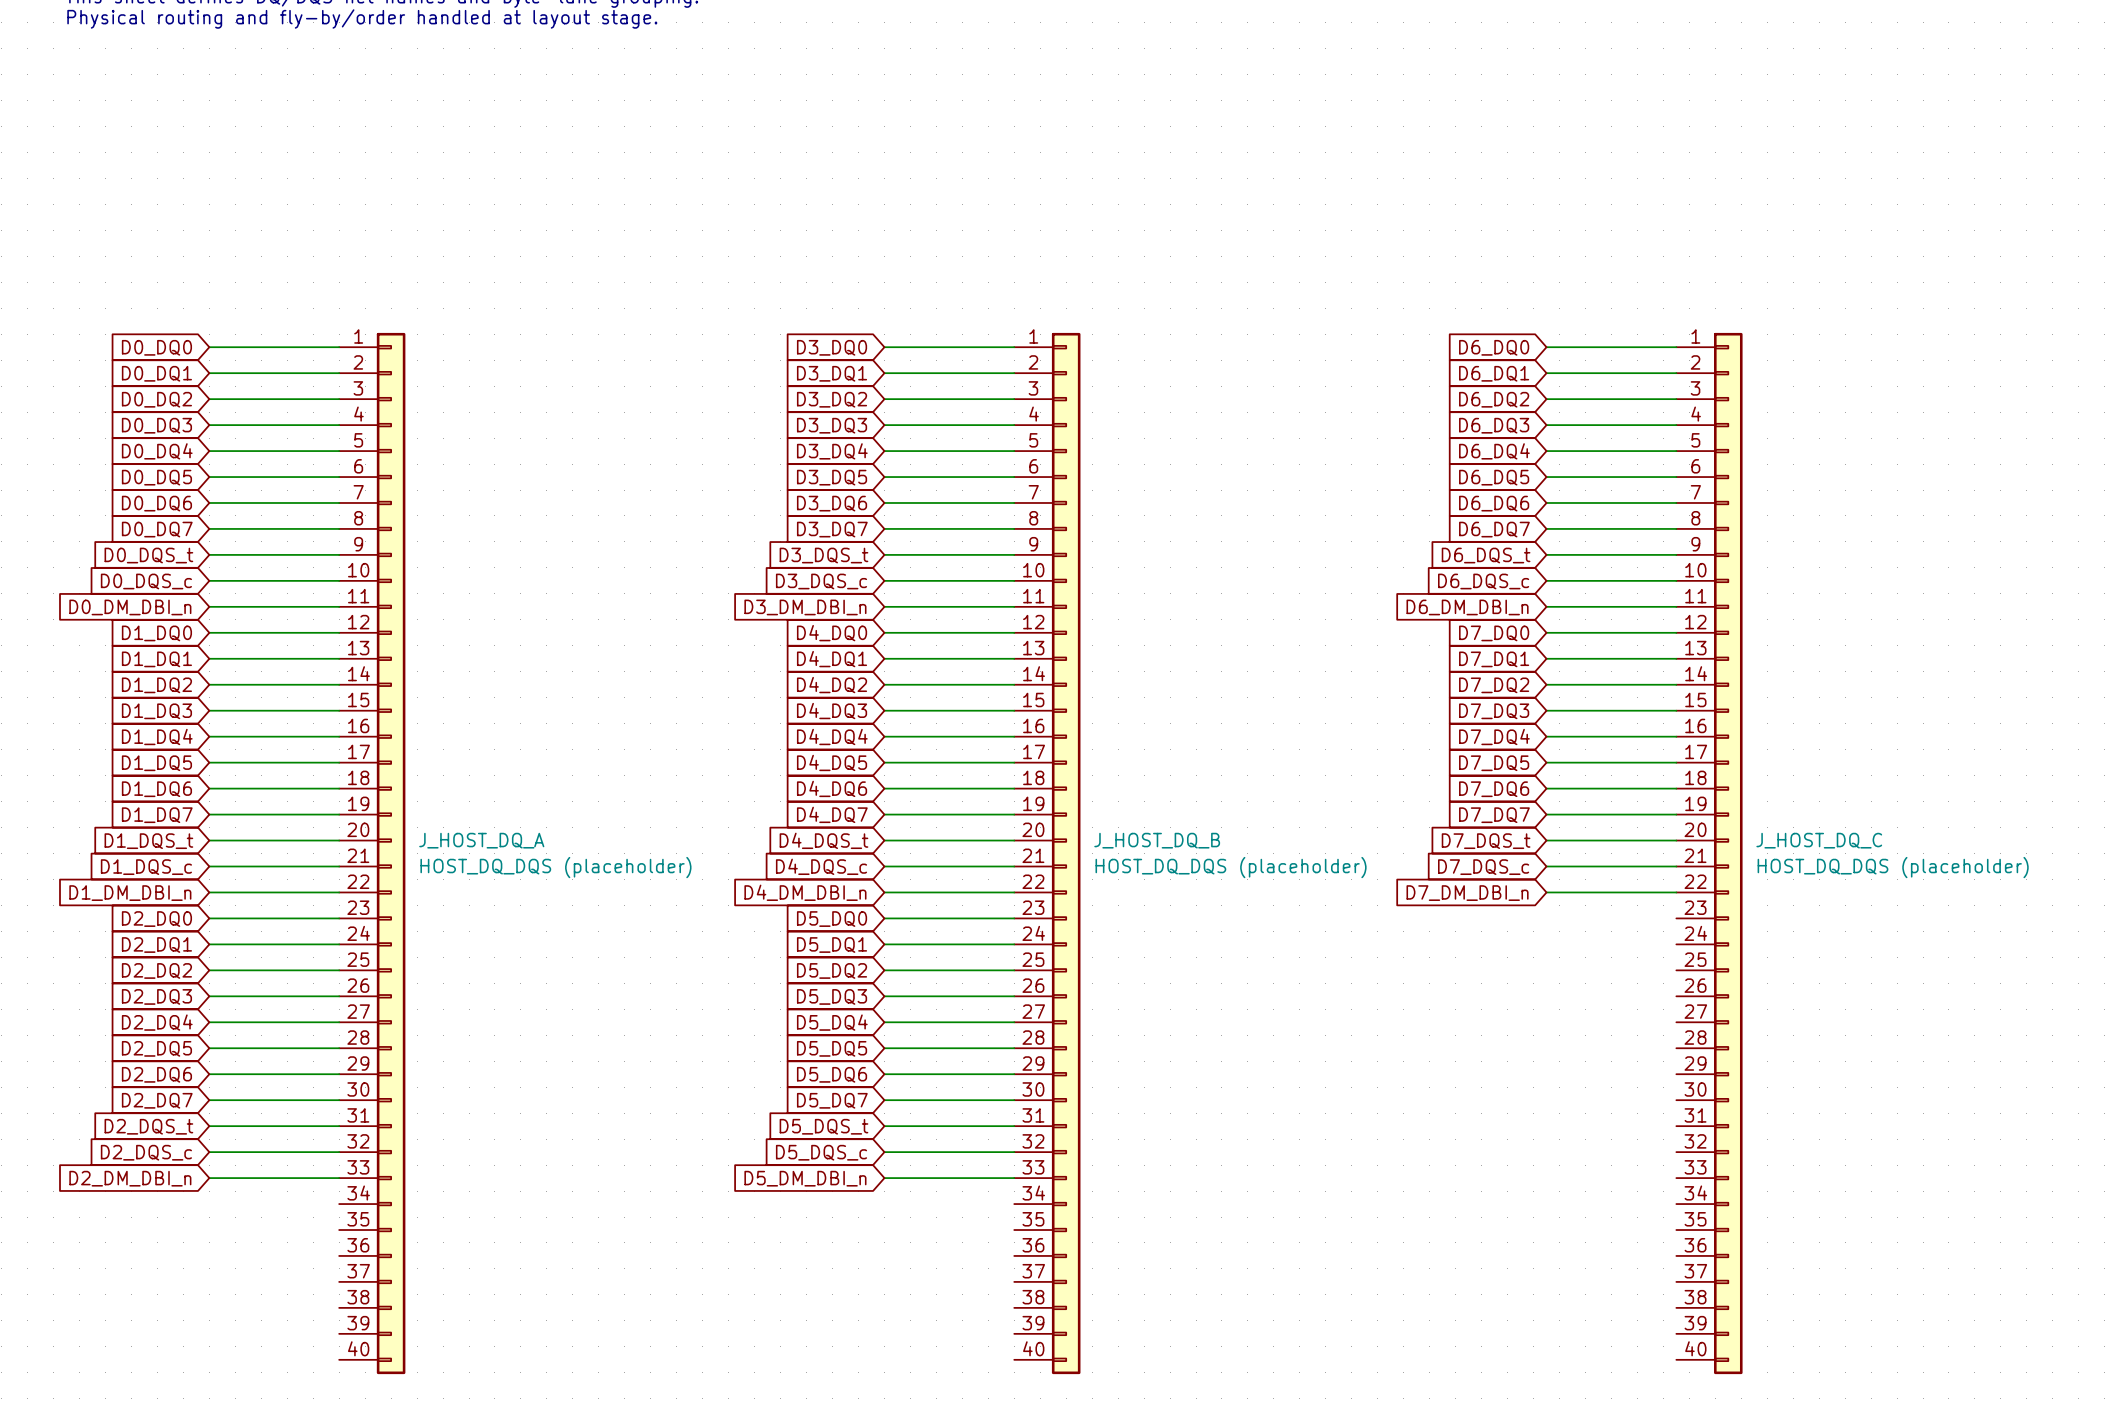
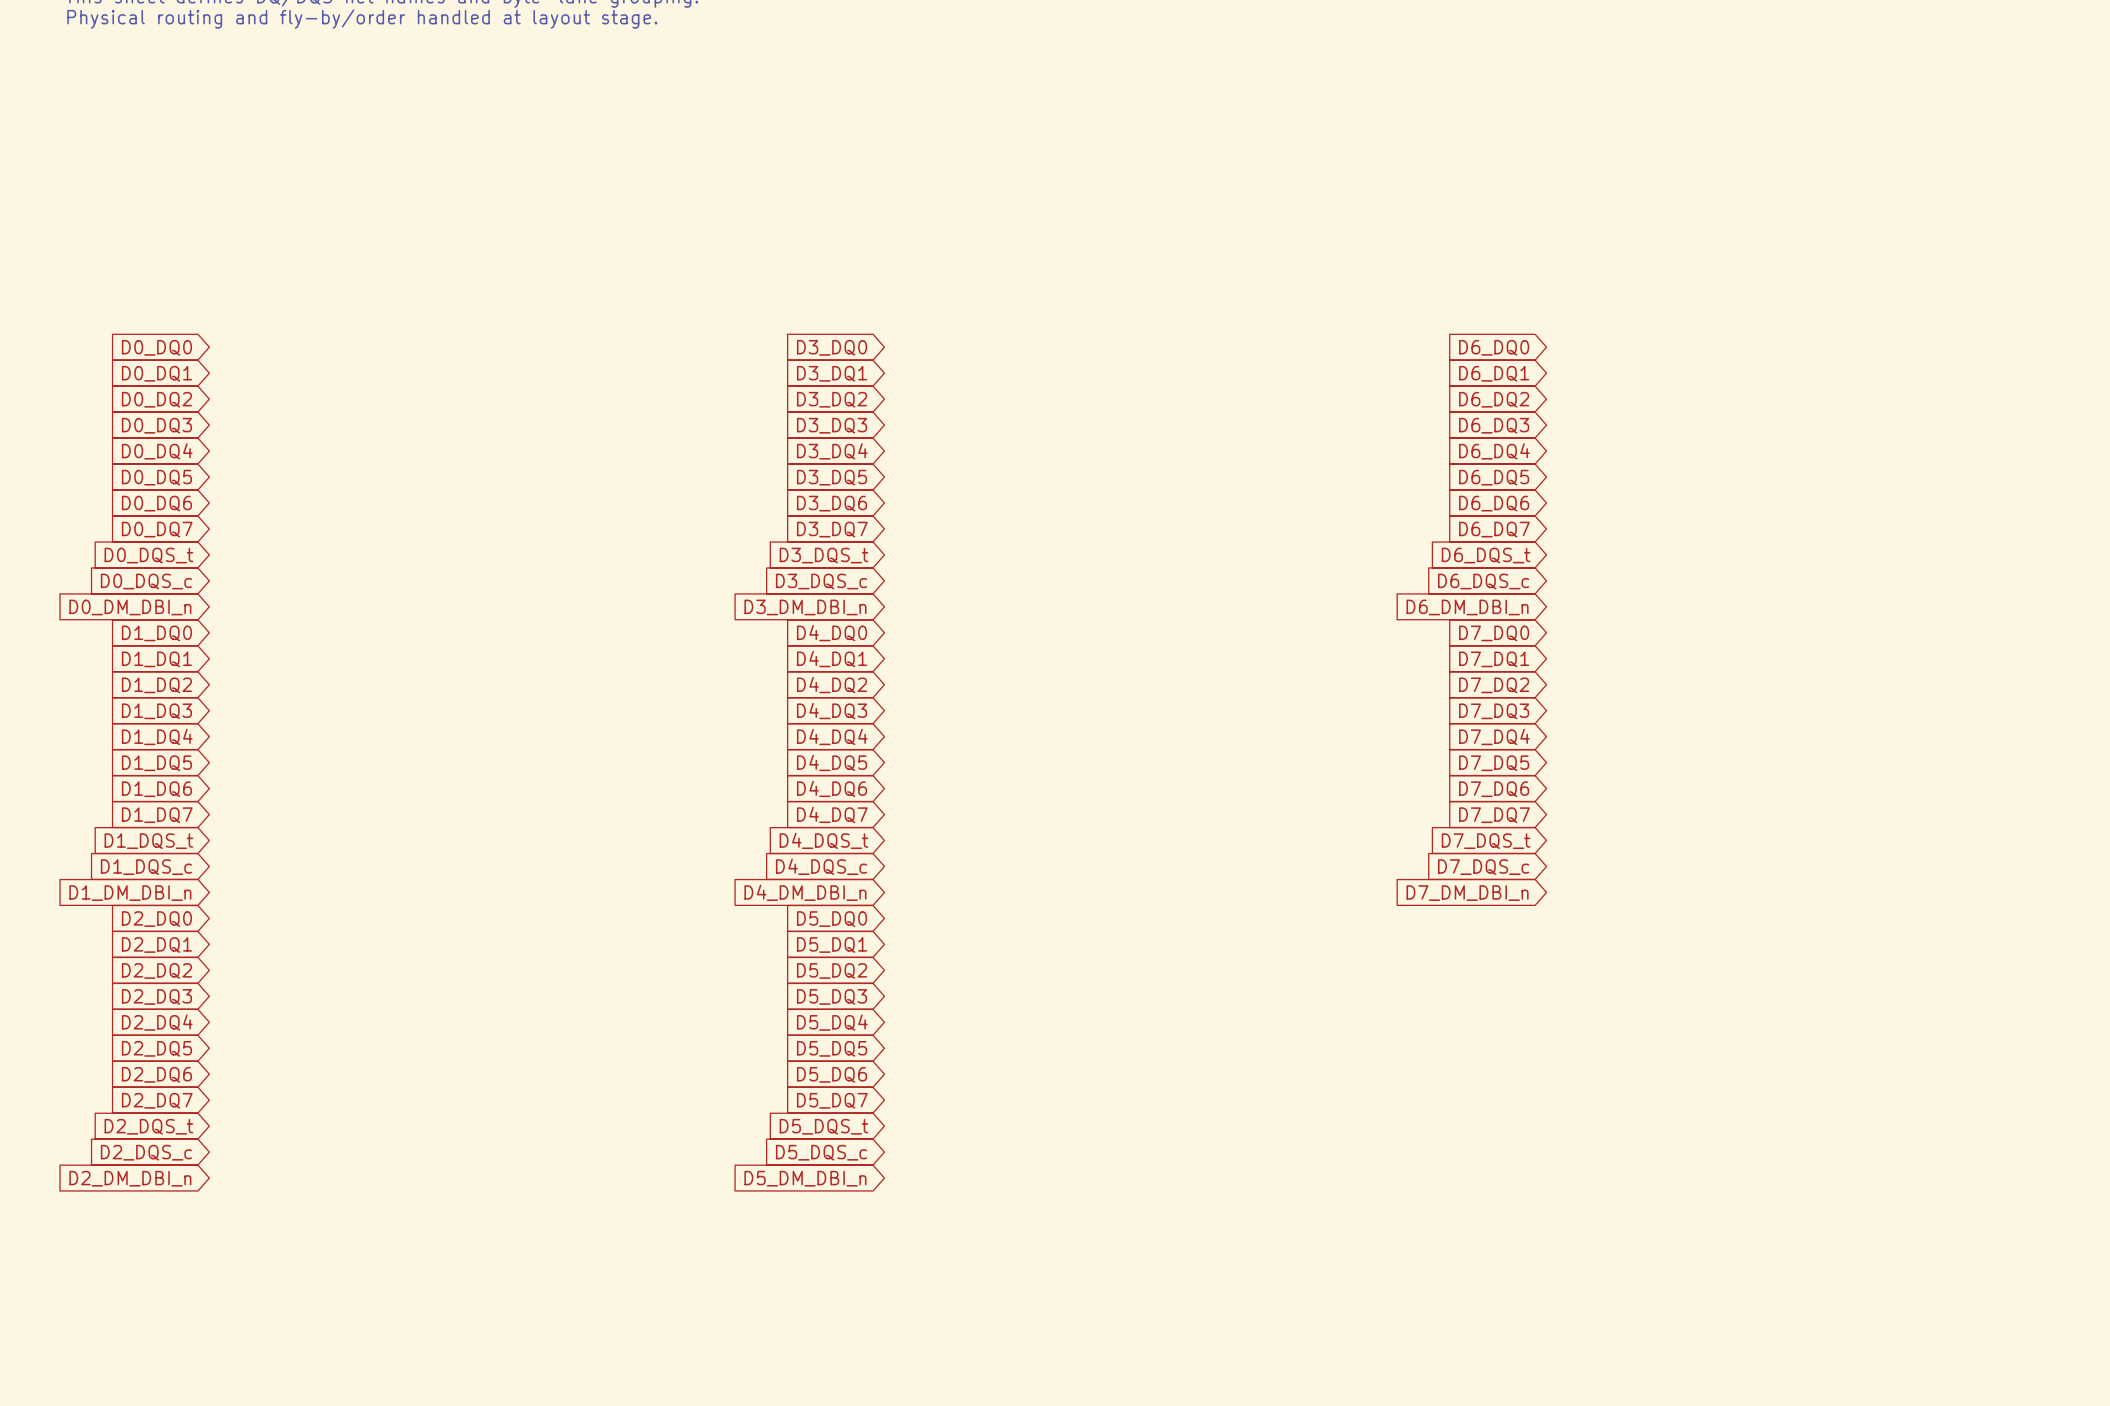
wire: (209, 347) (339, 347) -> none
wire: (884, 347) (1014, 347) -> none
wire: (1546, 347) (1676, 347) -> none
wire: (209, 373) (339, 373) -> none
wire: (884, 373) (1014, 373) -> none
wire: (1546, 373) (1676, 373) -> none
wire: (209, 399) (339, 399) -> none
wire: (884, 399) (1014, 399) -> none
wire: (1546, 399) (1676, 399) -> none
wire: (209, 425) (339, 425) -> none
wire: (884, 425) (1014, 425) -> none
wire: (1546, 425) (1676, 425) -> none
wire: (209, 451) (339, 451) -> none
wire: (884, 451) (1014, 451) -> none
wire: (1546, 451) (1676, 451) -> none
wire: (209, 477) (339, 477) -> none
wire: (884, 477) (1014, 477) -> none
wire: (1546, 477) (1676, 477) -> none
wire: (209, 502) (339, 502) -> none
wire: (884, 502) (1014, 502) -> none
wire: (1546, 502) (1676, 502) -> none
wire: (209, 528) (339, 528) -> none
wire: (884, 528) (1014, 528) -> none
wire: (1546, 528) (1676, 528) -> none
wire: (209, 554) (339, 554) -> none
wire: (884, 554) (1014, 554) -> none
wire: (1546, 554) (1676, 554) -> none
wire: (209, 580) (339, 580) -> none
wire: (884, 580) (1014, 580) -> none
wire: (1546, 580) (1676, 580) -> none
wire: (209, 606) (339, 606) -> none
wire: (884, 606) (1014, 606) -> none
wire: (1546, 606) (1676, 606) -> none
wire: (209, 632) (339, 632) -> none
wire: (884, 632) (1014, 632) -> none
wire: (1546, 632) (1676, 632) -> none
wire: (209, 658) (339, 658) -> none
wire: (884, 658) (1014, 658) -> none
wire: (1546, 658) (1676, 658) -> none
wire: (209, 684) (339, 684) -> none
wire: (884, 684) (1014, 684) -> none
wire: (1546, 684) (1676, 684) -> none
wire: (209, 710) (339, 710) -> none
wire: (884, 710) (1014, 710) -> none
wire: (1546, 710) (1676, 710) -> none
wire: (209, 736) (339, 736) -> none
wire: (884, 736) (1014, 736) -> none
wire: (1546, 736) (1676, 736) -> none
wire: (209, 762) (339, 762) -> none
wire: (884, 762) (1014, 762) -> none
wire: (1546, 762) (1676, 762) -> none
wire: (209, 788) (339, 788) -> none
wire: (884, 788) (1014, 788) -> none
wire: (1546, 788) (1676, 788) -> none
wire: (209, 814) (339, 814) -> none
wire: (884, 814) (1014, 814) -> none
wire: (1546, 814) (1676, 814) -> none
wire: (209, 840) (339, 840) -> none
wire: (884, 840) (1014, 840) -> none
wire: (1546, 840) (1676, 840) -> none
J_HOST_DQ_A: HOST_DQ_DQS (placeholder) (372, 853) -> none
J_HOST_DQ_B: HOST_DQ_DQS (placeholder) (1047, 853) -> none
J_HOST_DQ_C: HOST_DQ_DQS (placeholder) (1709, 853) -> none
wire: (209, 866) (339, 866) -> none
wire: (884, 866) (1014, 866) -> none
wire: (1546, 866) (1676, 866) -> none
wire: (209, 892) (339, 892) -> none
wire: (884, 892) (1014, 892) -> none
wire: (1546, 892) (1676, 892) -> none
wire: (209, 918) (339, 918) -> none
wire: (884, 918) (1014, 918) -> none
wire: (209, 944) (339, 944) -> none
wire: (884, 944) (1014, 944) -> none
wire: (209, 970) (339, 970) -> none
wire: (884, 970) (1014, 970) -> none
wire: (209, 996) (339, 996) -> none
wire: (884, 996) (1014, 996) -> none
wire: (209, 1022) (339, 1022) -> none
wire: (884, 1022) (1014, 1022) -> none
wire: (209, 1048) (339, 1048) -> none
wire: (884, 1048) (1014, 1048) -> none
wire: (209, 1074) (339, 1074) -> none
wire: (884, 1074) (1014, 1074) -> none
wire: (209, 1100) (339, 1100) -> none
wire: (884, 1100) (1014, 1100) -> none
wire: (209, 1126) (339, 1126) -> none
wire: (884, 1126) (1014, 1126) -> none
wire: (209, 1152) (339, 1152) -> none
wire: (884, 1152) (1014, 1152) -> none
wire: (209, 1178) (339, 1178) -> none
wire: (884, 1178) (1014, 1178) -> none

